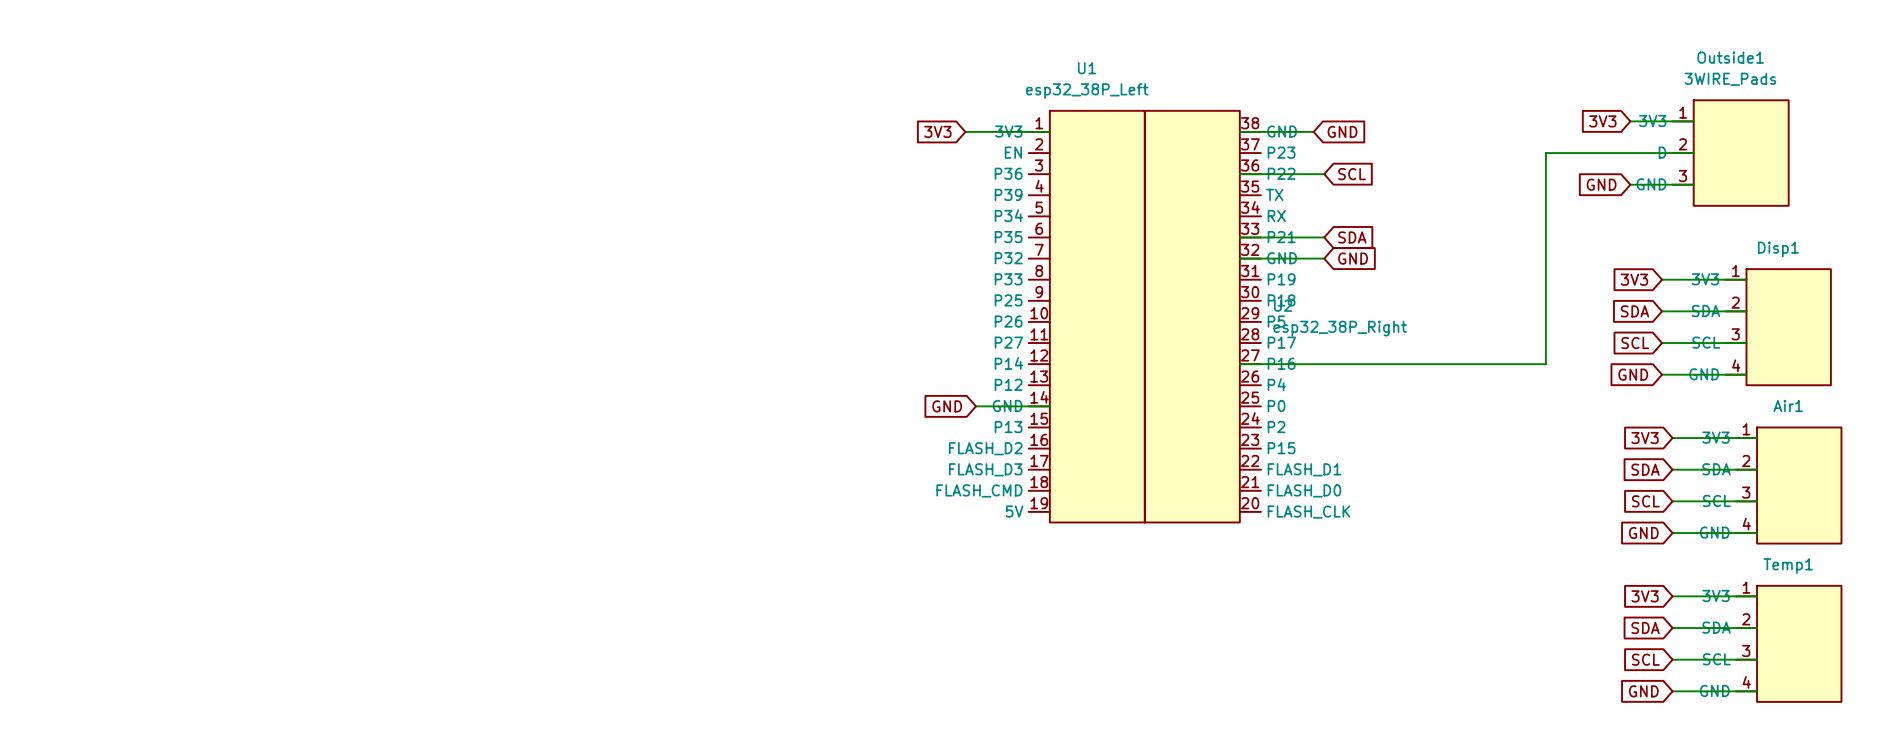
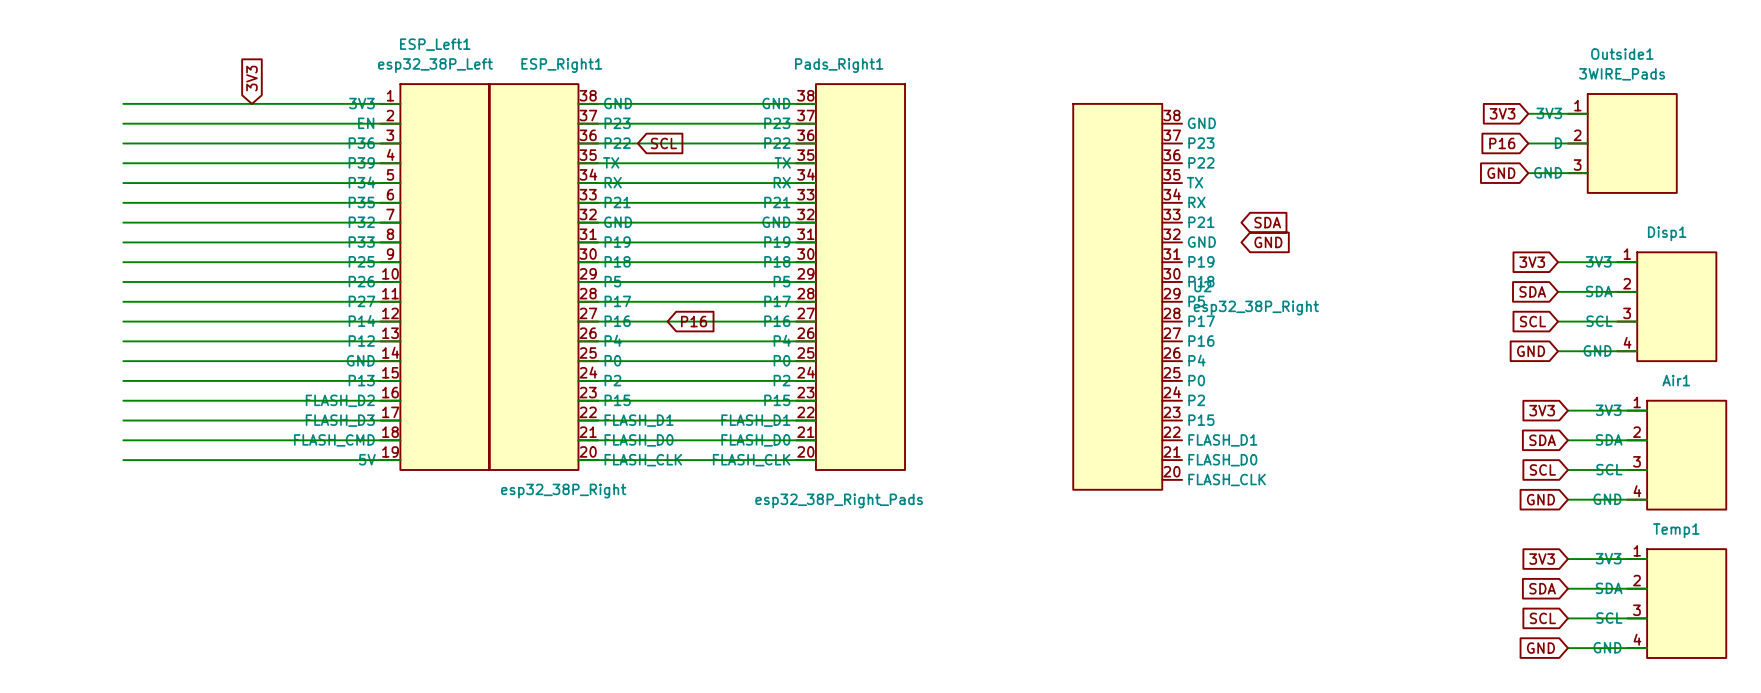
global label: none -> 3V3 (251, 78)
wire: none -> (123, 103) (400, 103)
wire: none -> (578, 103) (815, 103)
wire: none -> (123, 123) (400, 123)
wire: none -> (578, 123) (815, 123)
global label: 3V3 (937, 131) -> none
wire: (965, 131) (1049, 131) -> none
wire: (1239, 131) (1313, 131) -> none
global label: GND (1342, 131) -> none
wire: none -> (123, 143) (400, 143)
wire: none -> (578, 143) (815, 143)
global label: none -> SCL (663, 143)
global label: none -> P16 (1502, 143)
wire: (1630, 153) (1545, 153) (1545, 364) (1239, 364) -> none
wire: none -> (123, 163) (400, 163)
wire: none -> (578, 163) (815, 163)
wire: (1239, 174) (1324, 174) -> none
global label: SCL (1352, 174) -> none
wire: none -> (123, 183) (400, 183)
wire: none -> (578, 183) (815, 183)
wire: none -> (123, 202) (400, 202)
wire: none -> (578, 202) (815, 202)
wire: none -> (123, 222) (400, 222)
wire: none -> (578, 222) (815, 222)
wire: (1239, 237) (1324, 237) -> none
wire: none -> (123, 242) (400, 242)
wire: none -> (578, 242) (815, 242)
wire: (1239, 258) (1324, 258) -> none
wire: none -> (123, 262) (400, 262)
wire: none -> (578, 262) (815, 262)
ESP_Left1: none -> esp32_38P_Left (435, 277)
ESP_Right1: none -> esp32_38P_Right (543, 277)
Pads_Right1: none -> esp32_38P_Right_Pads (850, 277)
wire: none -> (123, 281) (400, 281)
wire: none -> (578, 281) (815, 281)
U1: esp32_38P_Left (1086, 316) -> none
wire: none -> (123, 301) (400, 301)
wire: none -> (578, 301) (815, 301)
wire: none -> (123, 321) (400, 321)
wire: none -> (578, 321) (815, 321)
global label: none -> P16 (694, 321)
wire: none -> (123, 341) (400, 341)
wire: none -> (578, 341) (815, 341)
wire: none -> (123, 361) (400, 361)
wire: none -> (578, 361) (815, 361)
wire: none -> (123, 380) (400, 380)
wire: none -> (578, 380) (815, 380)
global label: GND (947, 406) -> none
wire: (975, 406) (1049, 406) -> none
wire: none -> (123, 400) (400, 400)
wire: none -> (578, 400) (815, 400)
wire: none -> (123, 420) (400, 420)
wire: none -> (578, 420) (815, 420)
wire: none -> (123, 440) (400, 440)
wire: none -> (578, 440) (815, 440)
wire: none -> (123, 460) (400, 460)
wire: none -> (578, 460) (815, 460)

